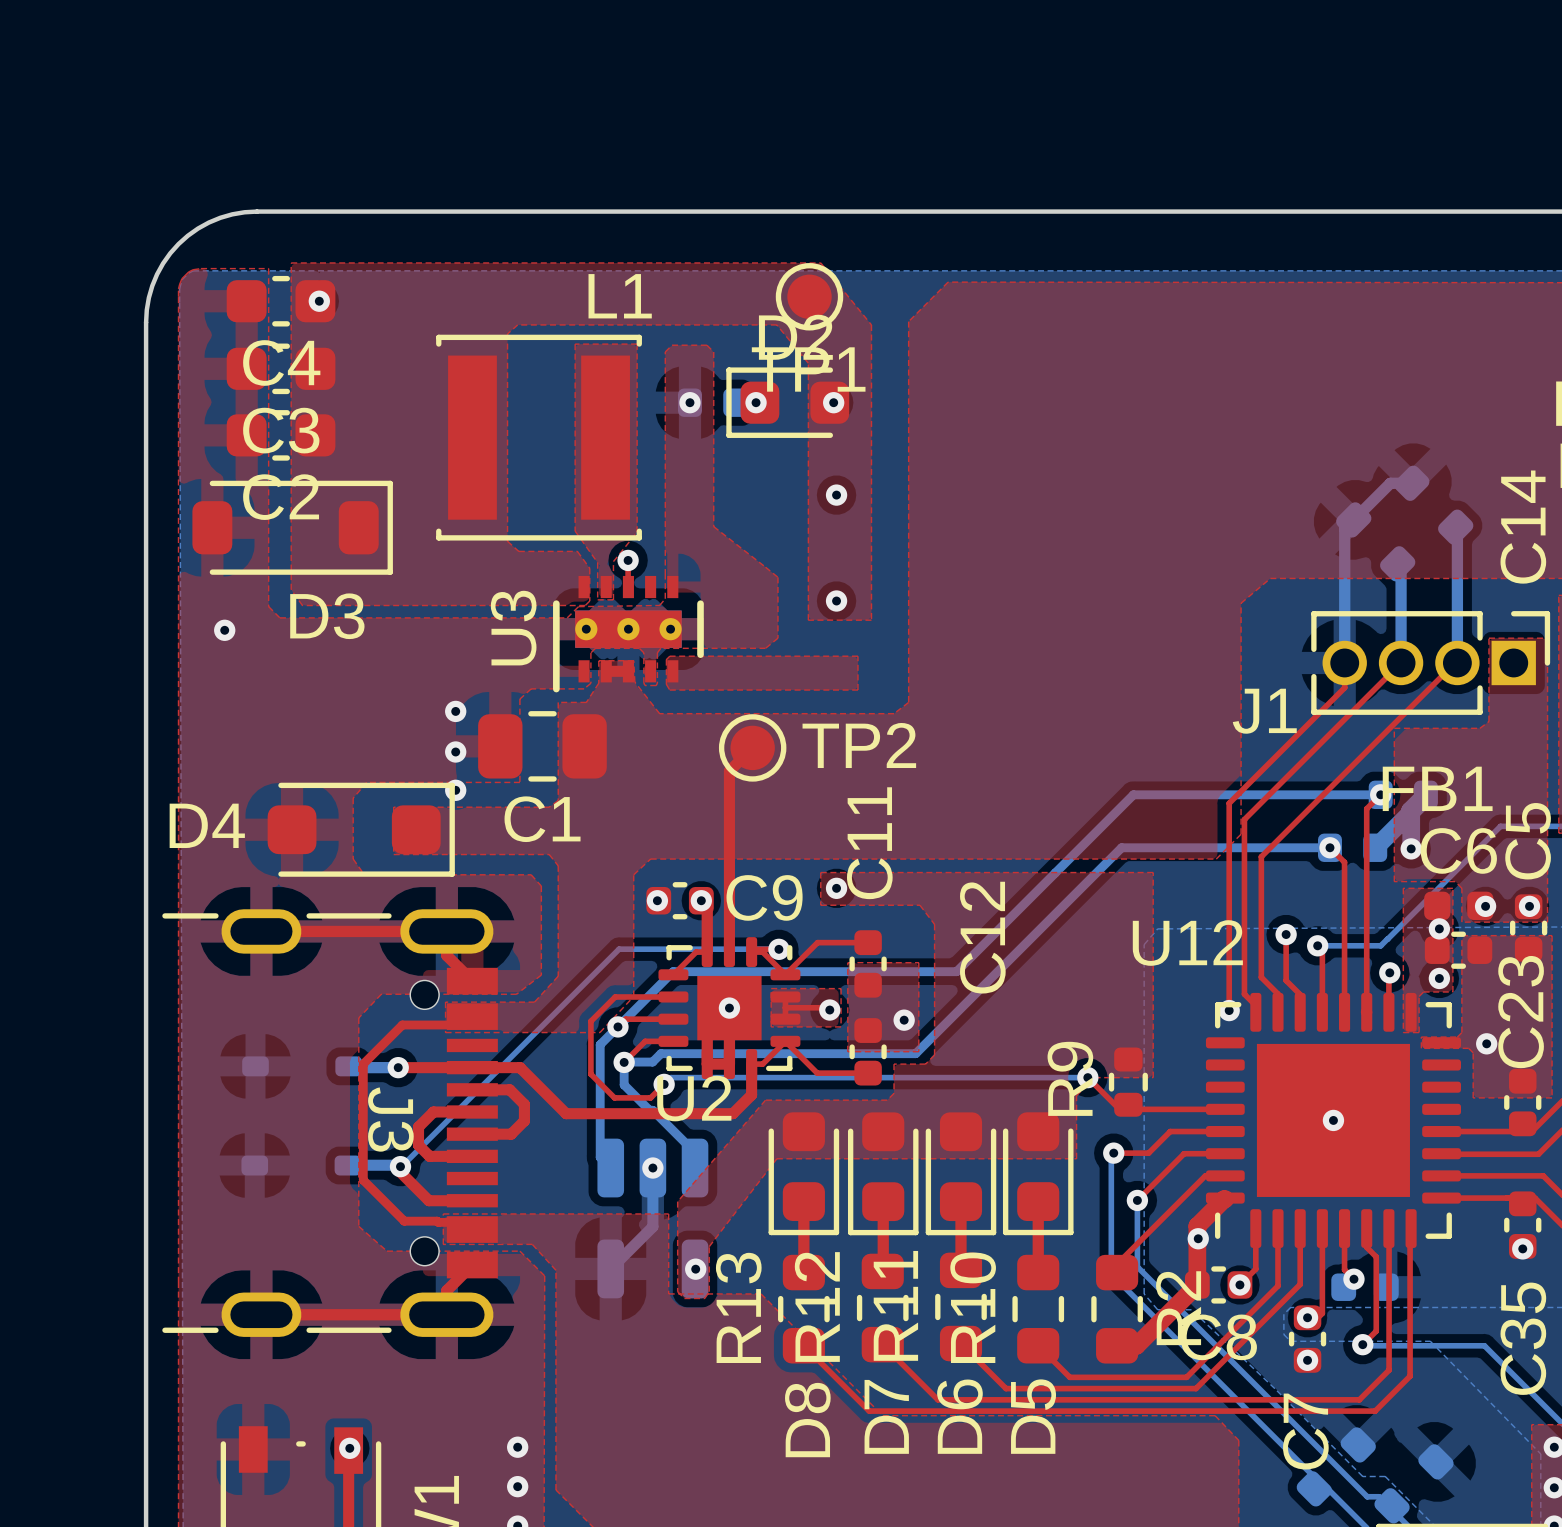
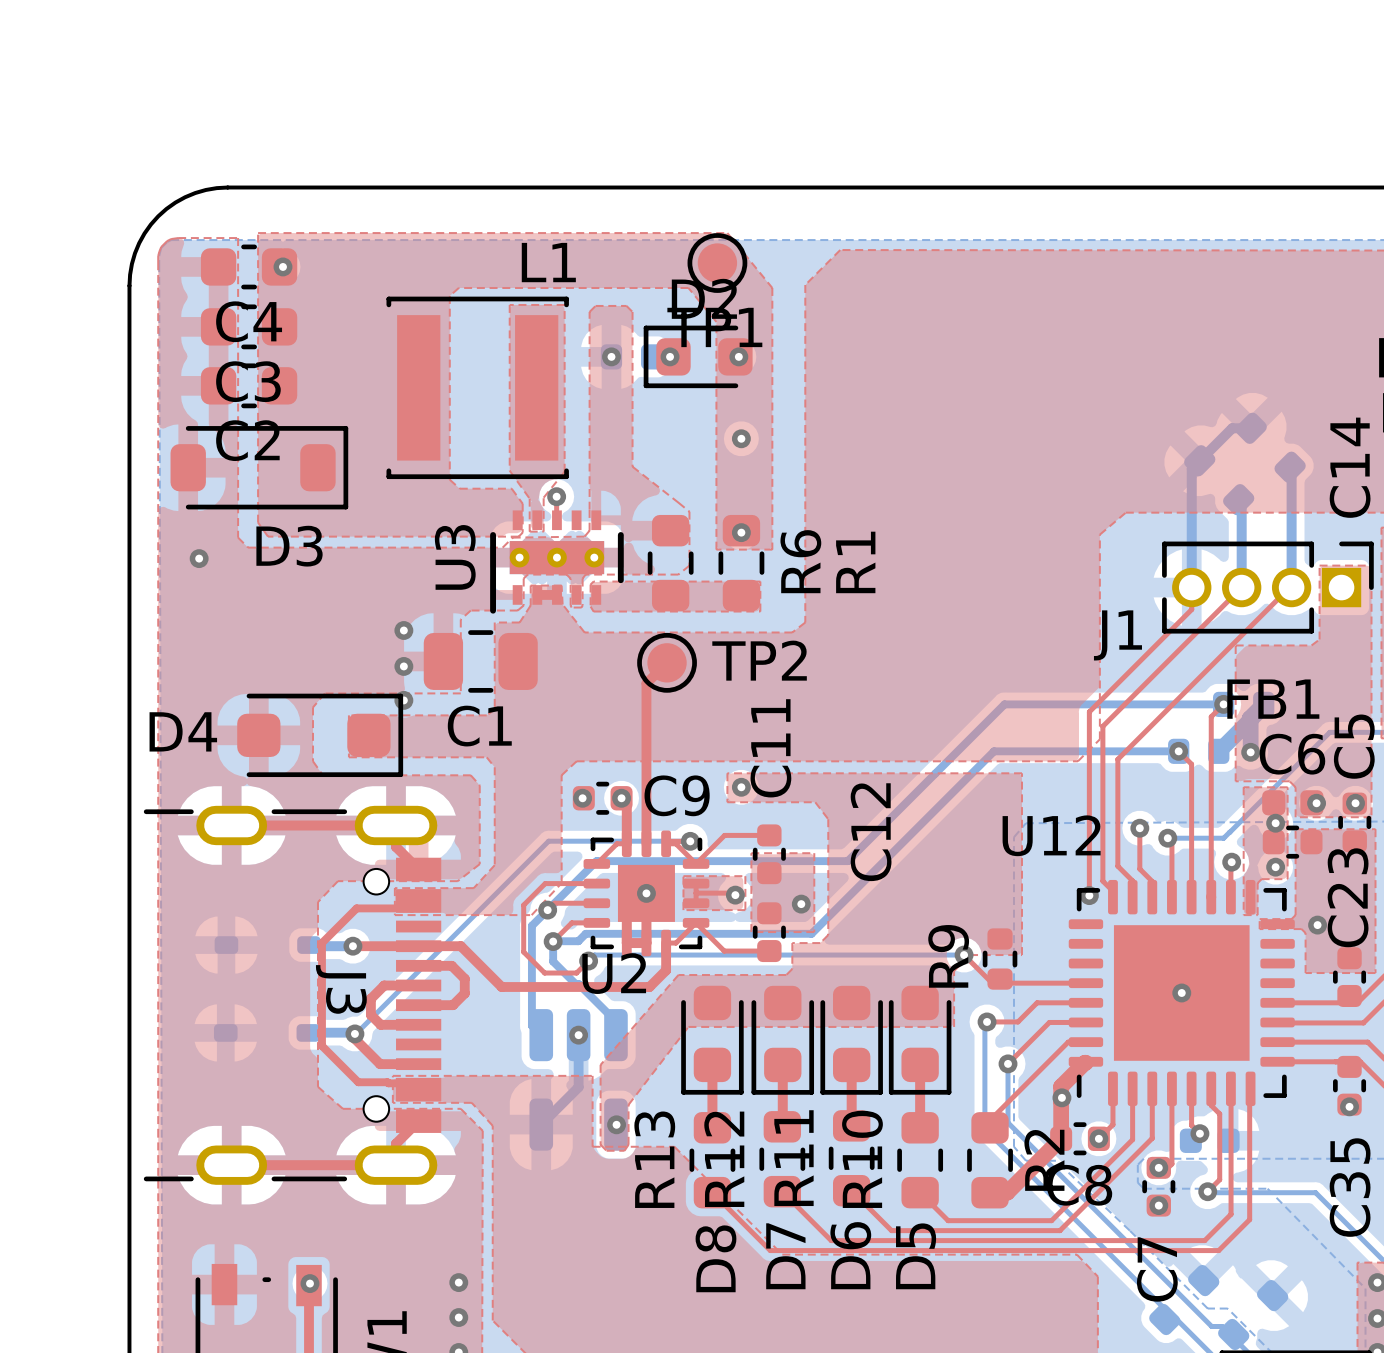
R6: none -> (670, 563)
R1: none -> (741, 563)

